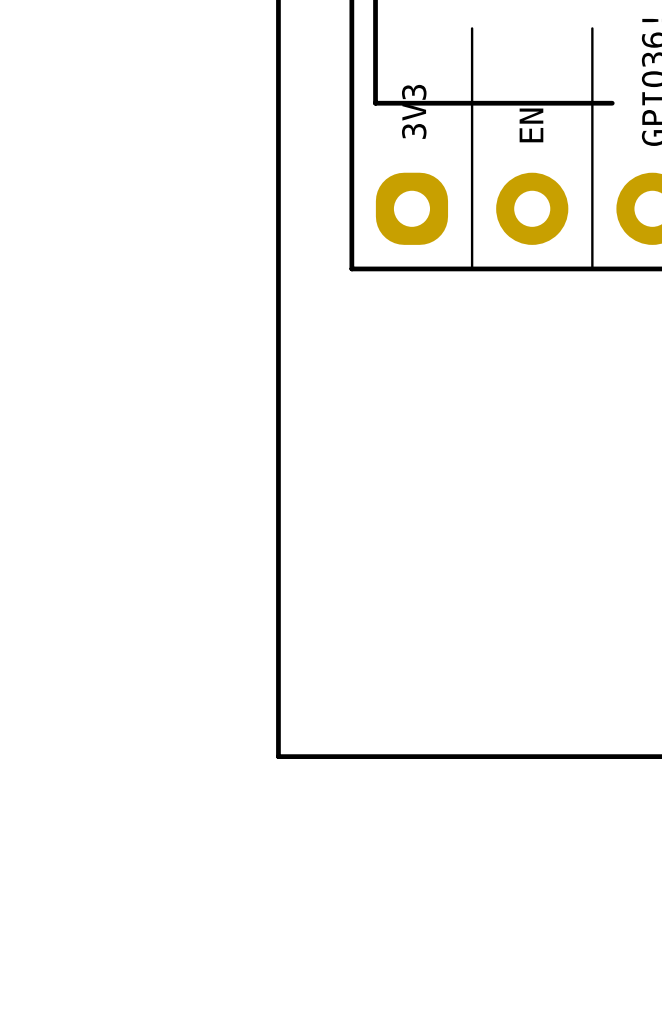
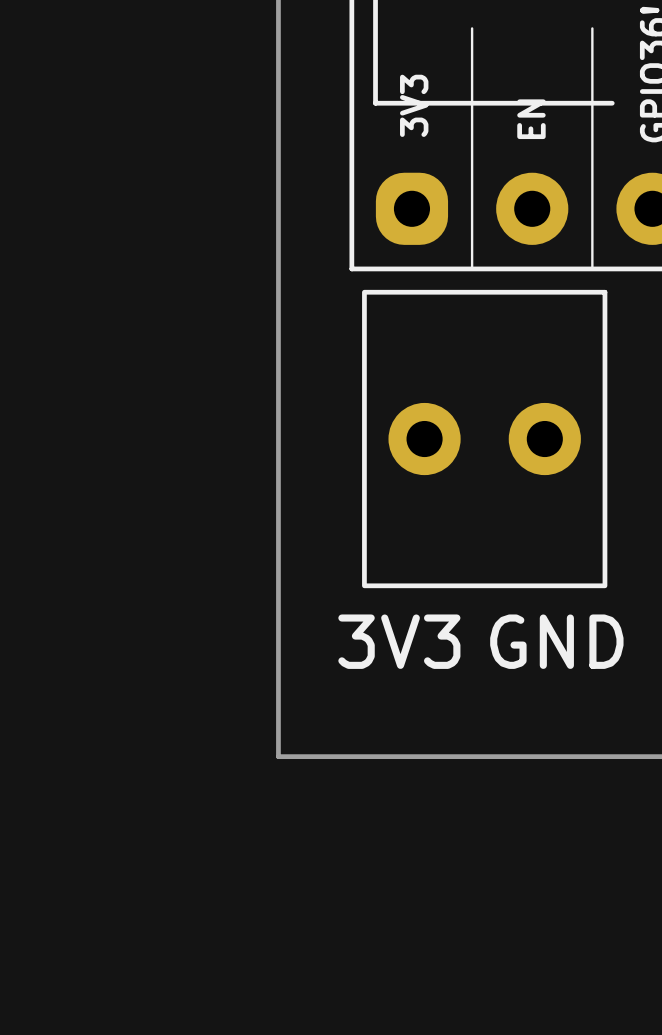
part: none -> (484, 439)
text: none -> 3V3 (399, 641)
text: none -> GND (556, 641)

